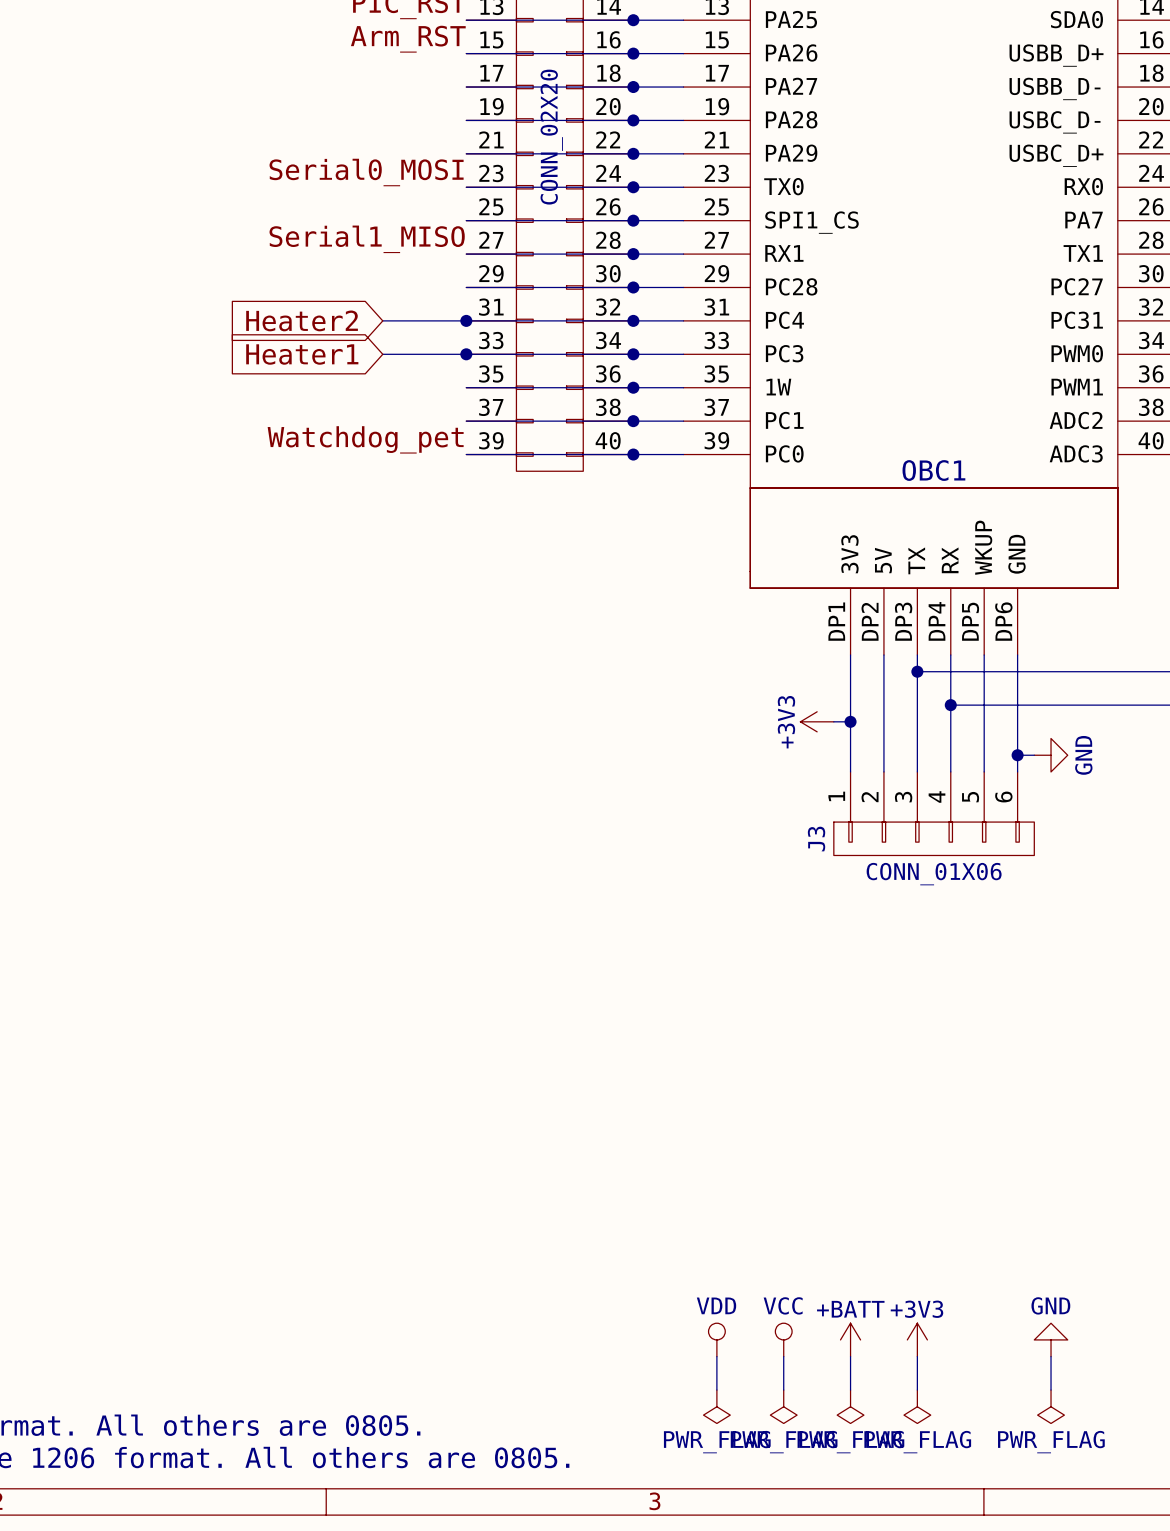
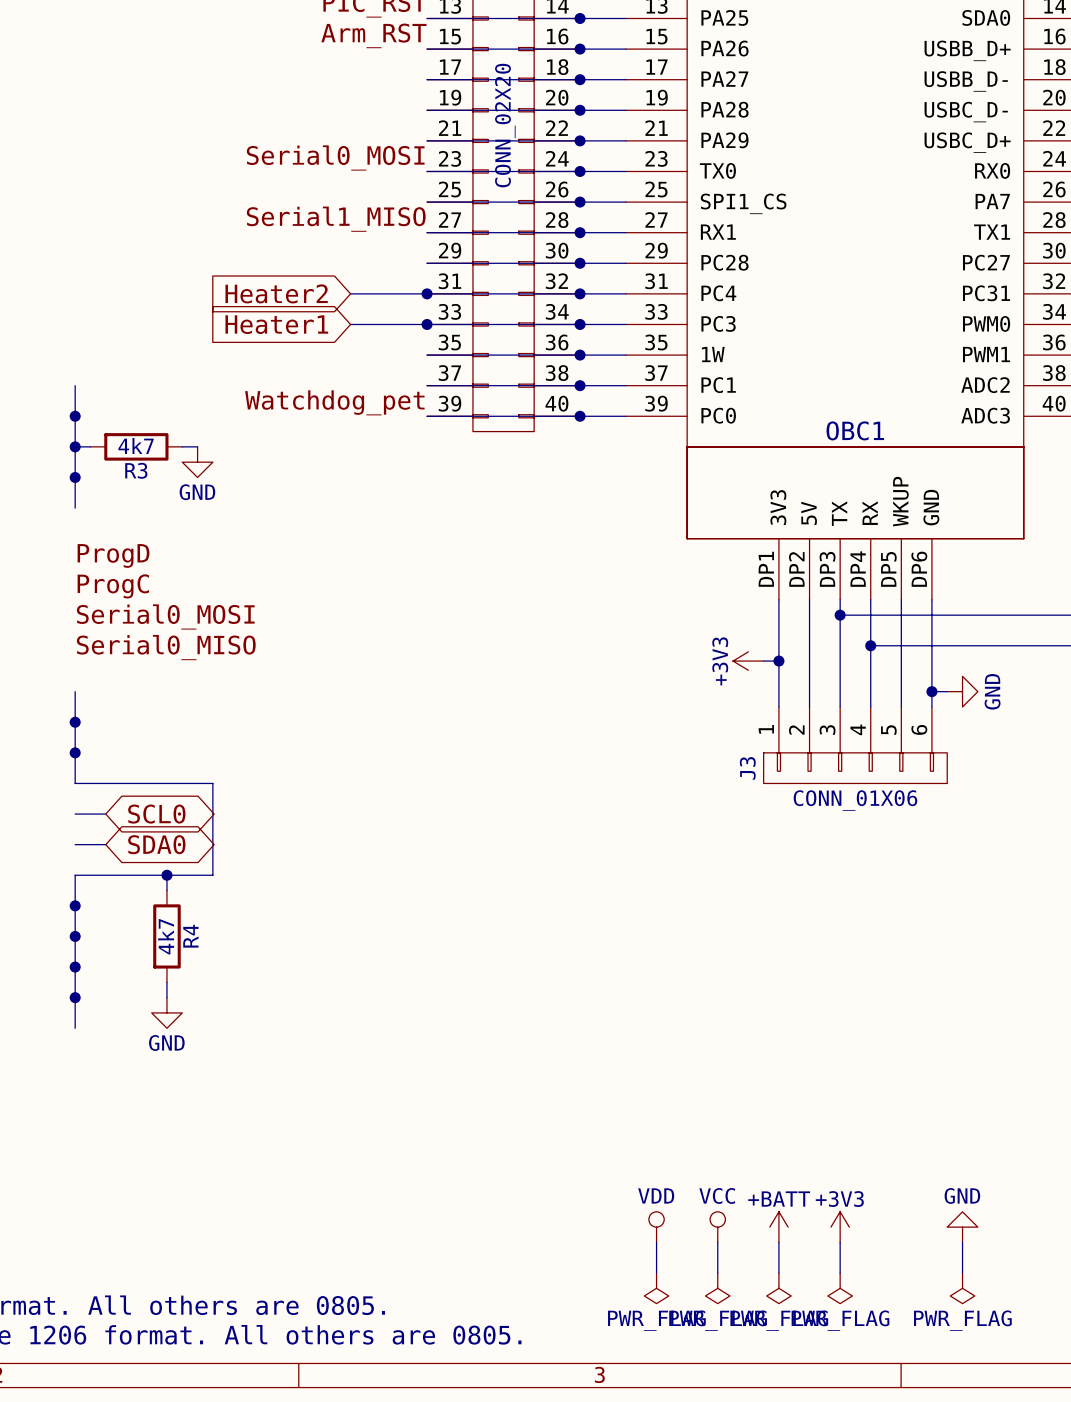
wire: none -> (75, 385) (75, 508)
junction: none -> (75, 416)
wire: none -> (75, 446) (90, 446)
junction: none -> (75, 446)
R3: none -> 4k7 (136, 446)
wire: none -> (182, 446) (197, 446)
power symbol: none -> GND (197, 462)
junction: none -> (75, 477)
label: none -> ProgD (113, 555)
label: none -> ProgC (113, 586)
label: none -> Serial0_MOSI (165, 616)
label: none -> Serial0_MISO (166, 647)
wire: none -> (75, 691) (75, 783) (212, 783) (212, 875) (75, 875) (75, 1028)
junction: none -> (75, 722)
junction: none -> (75, 752)
wire: none -> (75, 814) (105, 814)
global label: none -> SCL0 (156, 814)
wire: none -> (75, 844) (105, 844)
global label: none -> SDA0 (156, 844)
wire: none -> (166, 875) (166, 890)
junction: none -> (166, 875)
junction: none -> (75, 905)
junction: none -> (75, 936)
R4: none -> 4k7 (166, 936)
junction: none -> (75, 967)
wire: none -> (166, 982) (166, 997)
junction: none -> (75, 997)
power symbol: none -> GND (166, 1012)

